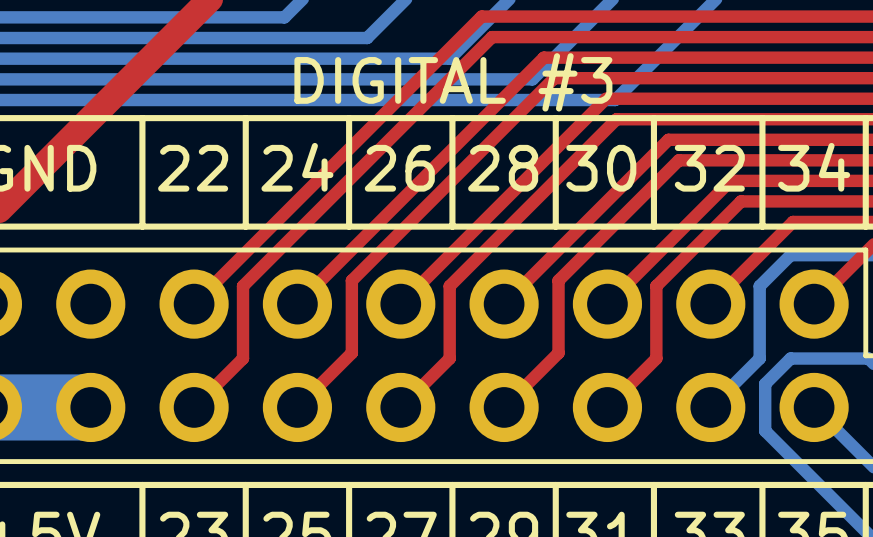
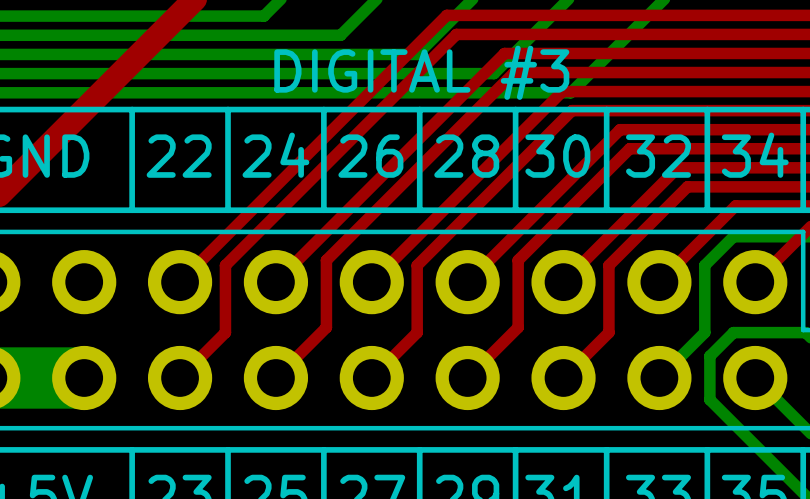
part text: none -> DIGITAL #3 (421, 72)
part value: DIGITAL #3 (453, 82) -> none

